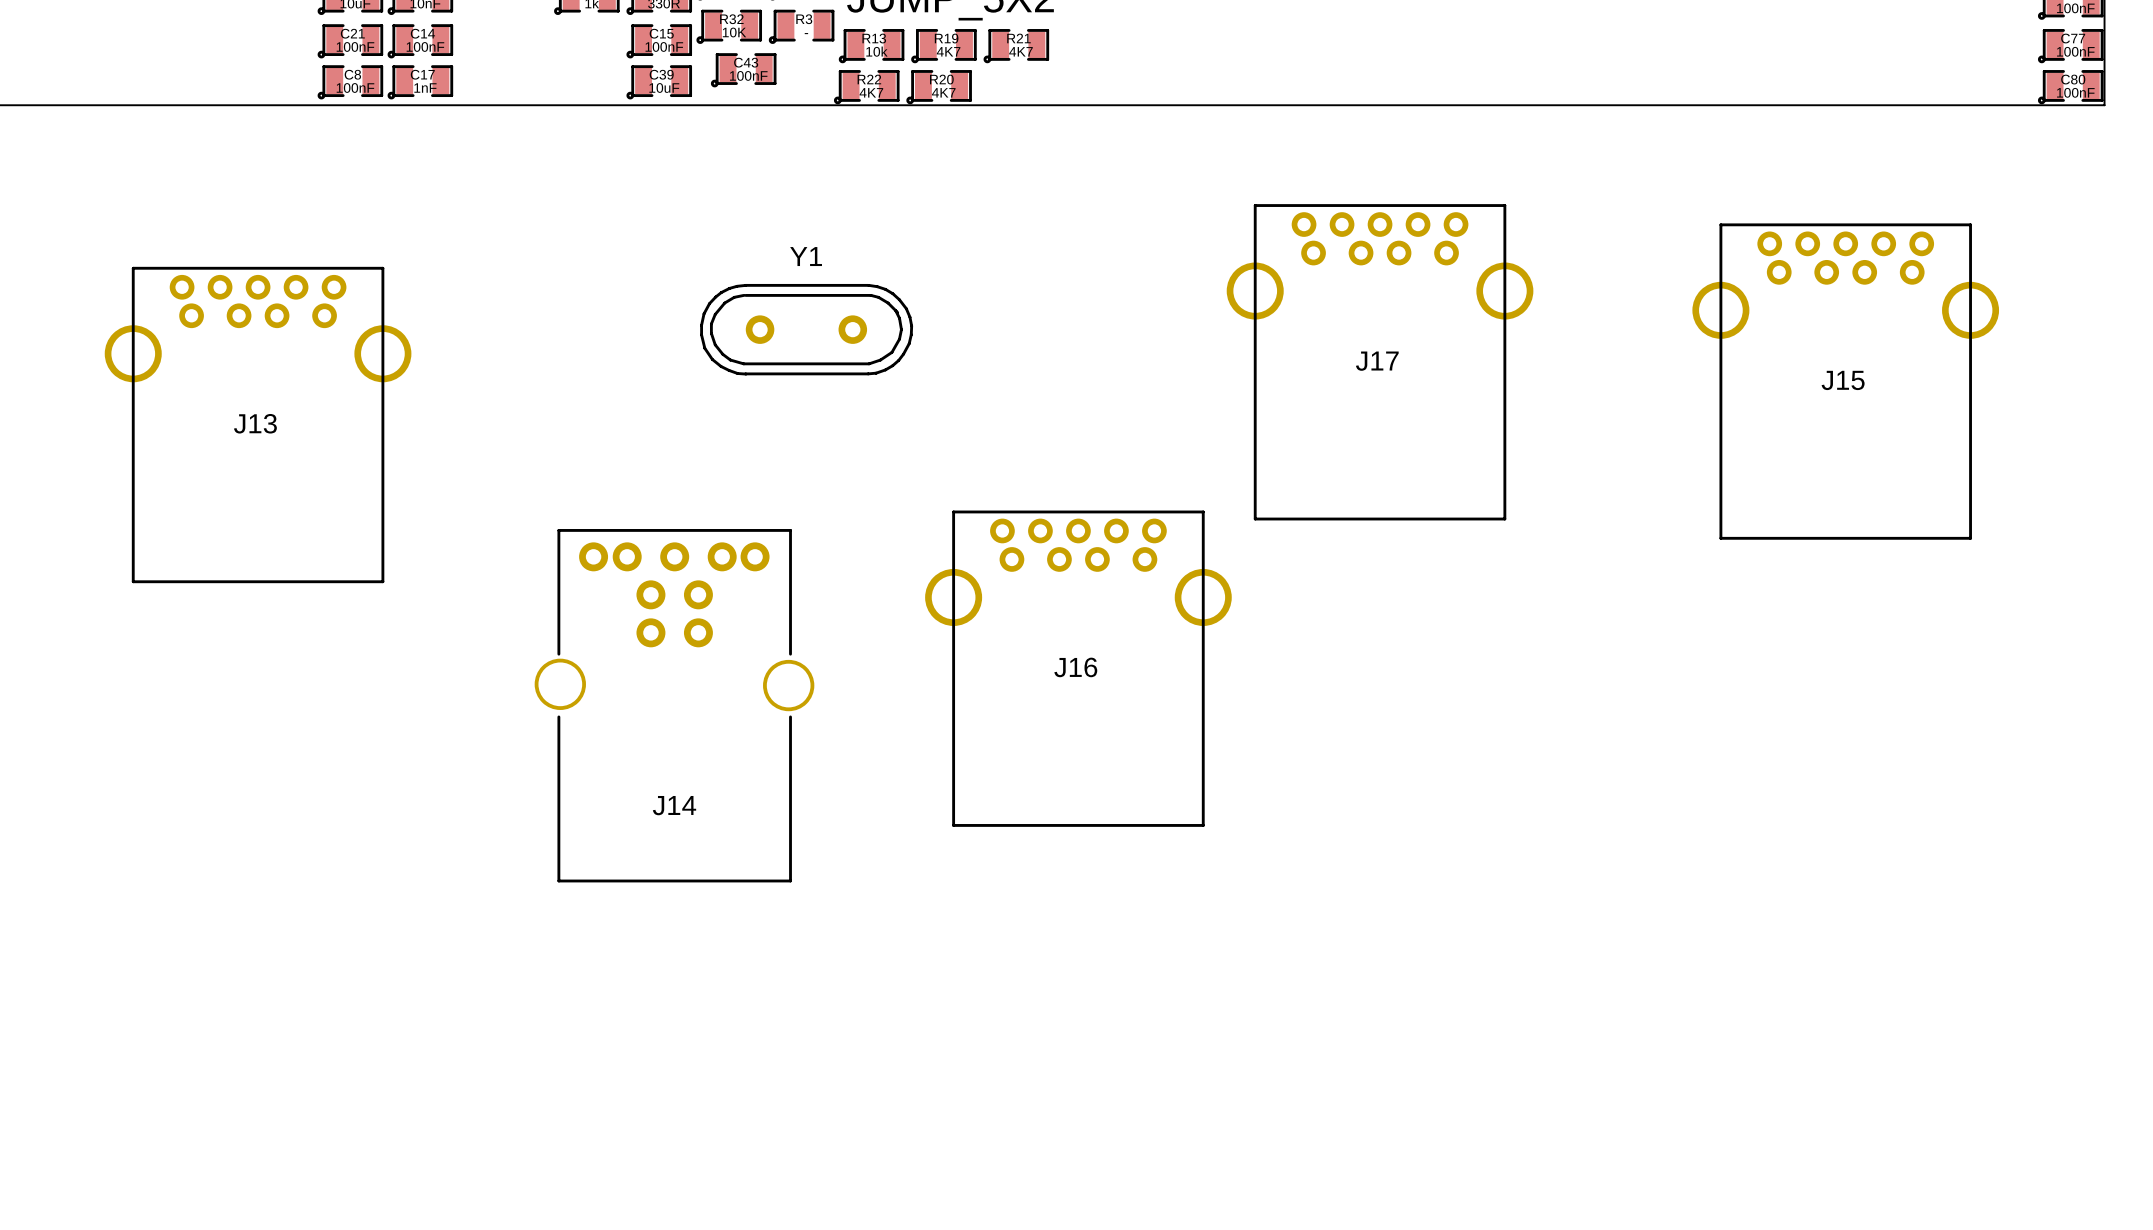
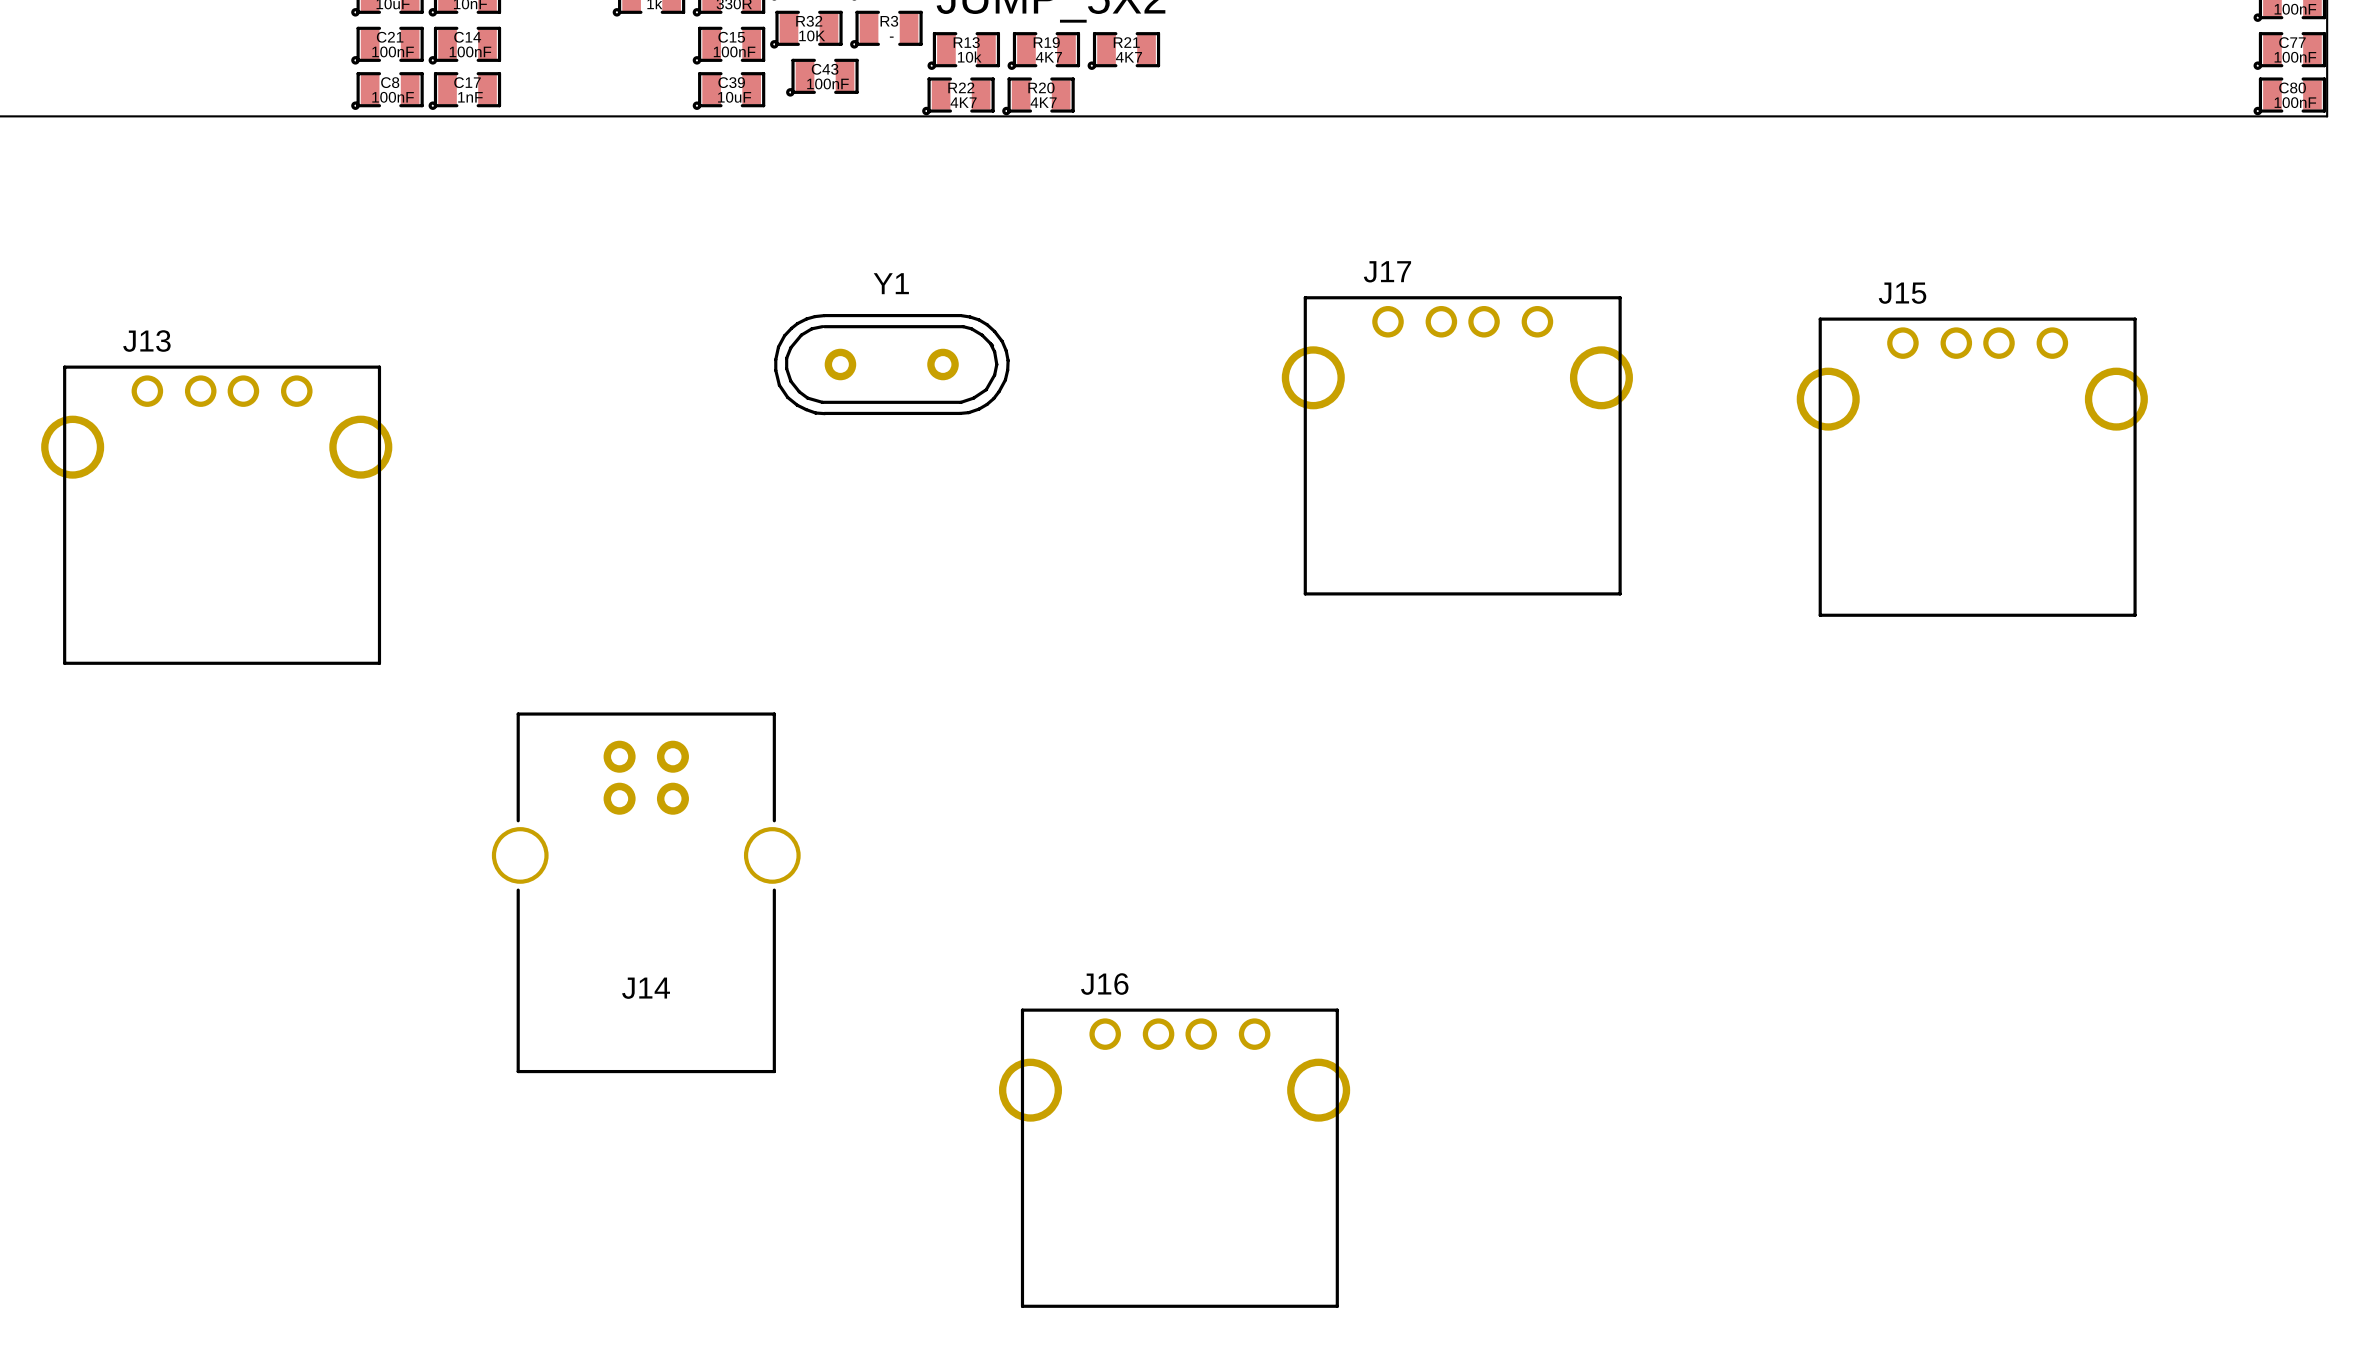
J17 footprint: [1226, 204, 1534, 521] -> [1281, 296, 1633, 596]
J15 footprint: [1692, 223, 2000, 540] -> [1796, 317, 2148, 617]
J13 footprint: [104, 266, 412, 584] -> [41, 365, 393, 665]
J17 name position: J17 (1377, 361) -> J17 (1387, 271)
J15 name position: J15 (1843, 380) -> J15 (1902, 293)
J13 name position: J13 (255, 423) -> J13 (146, 341)
J16 footprint: [925, 510, 1232, 827] -> [998, 1008, 1351, 1308]
J14 footprint: [534, 529, 815, 883] -> [491, 712, 801, 1074]
J16 name position: J16 (1075, 667) -> J16 (1104, 984)

